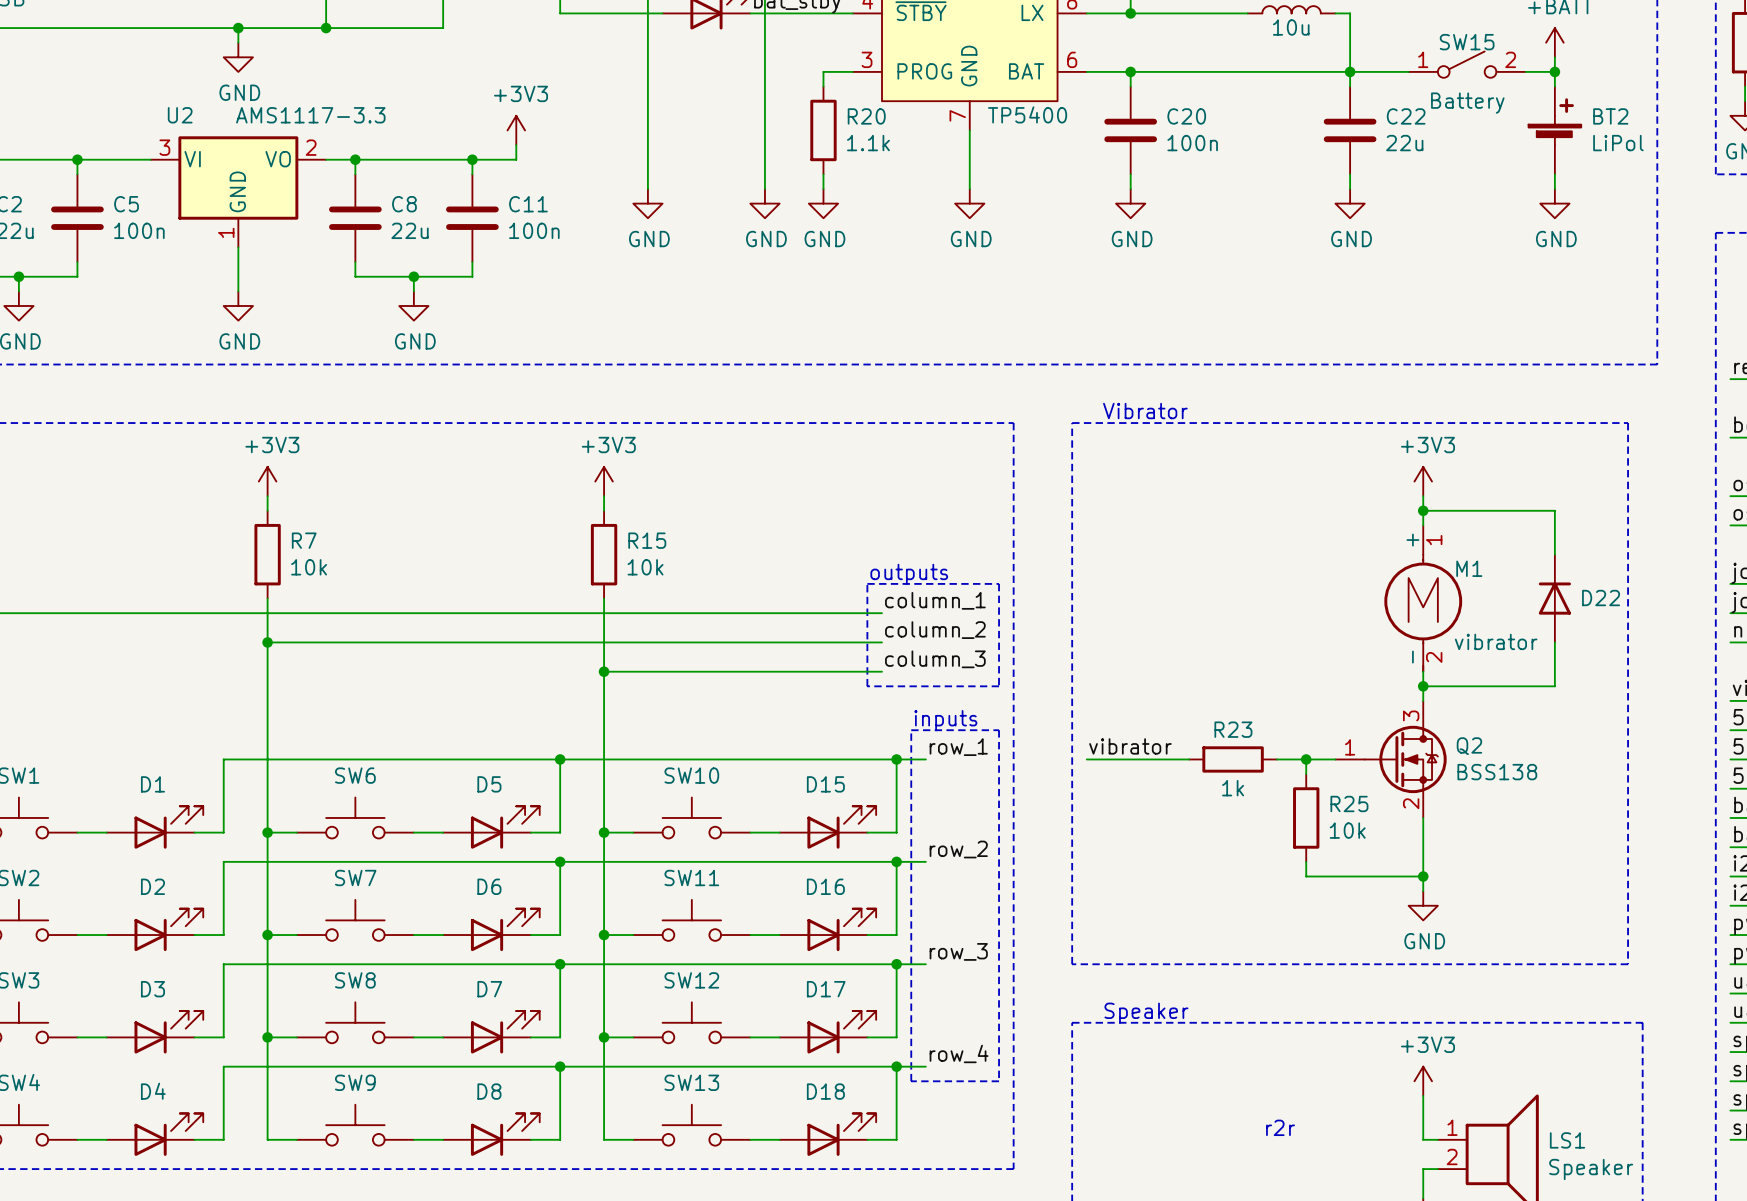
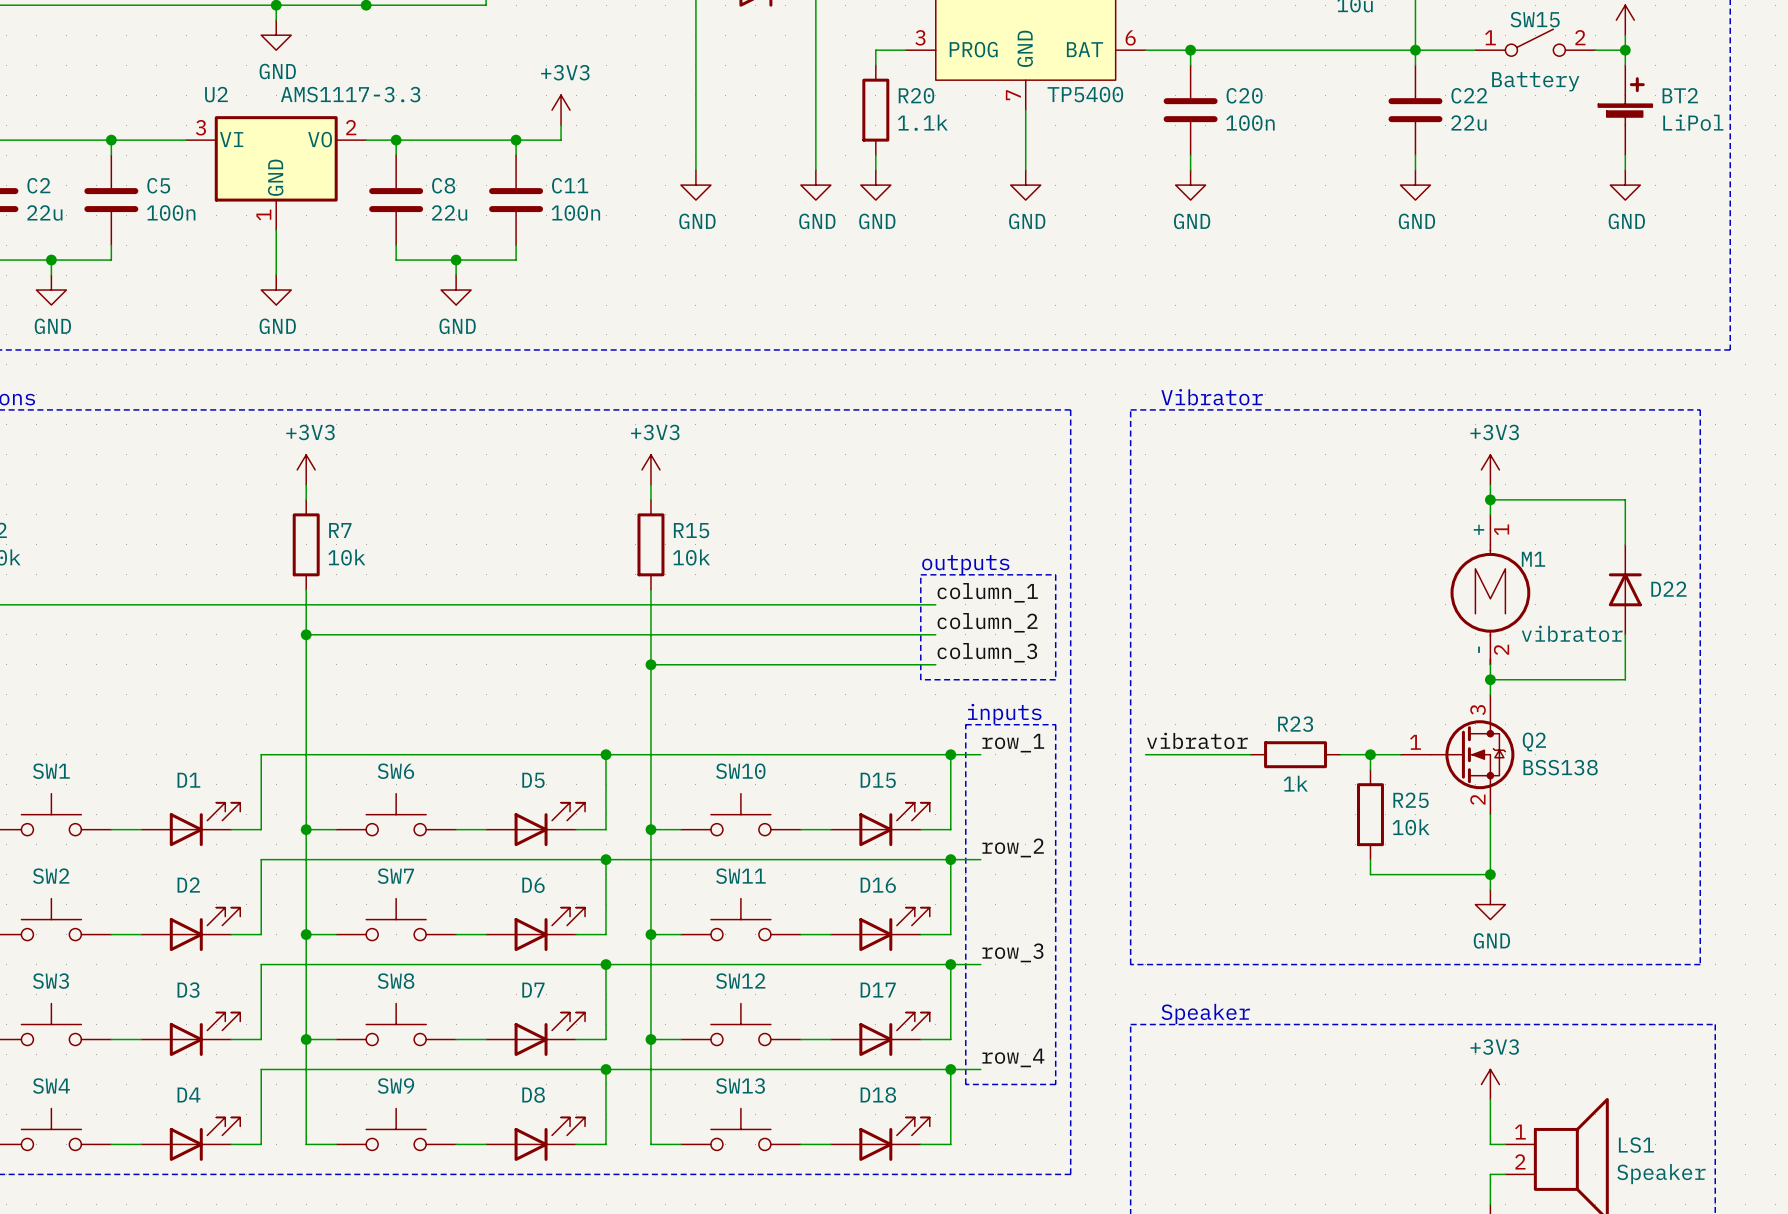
text: r2r (1280, 1127) -> none

